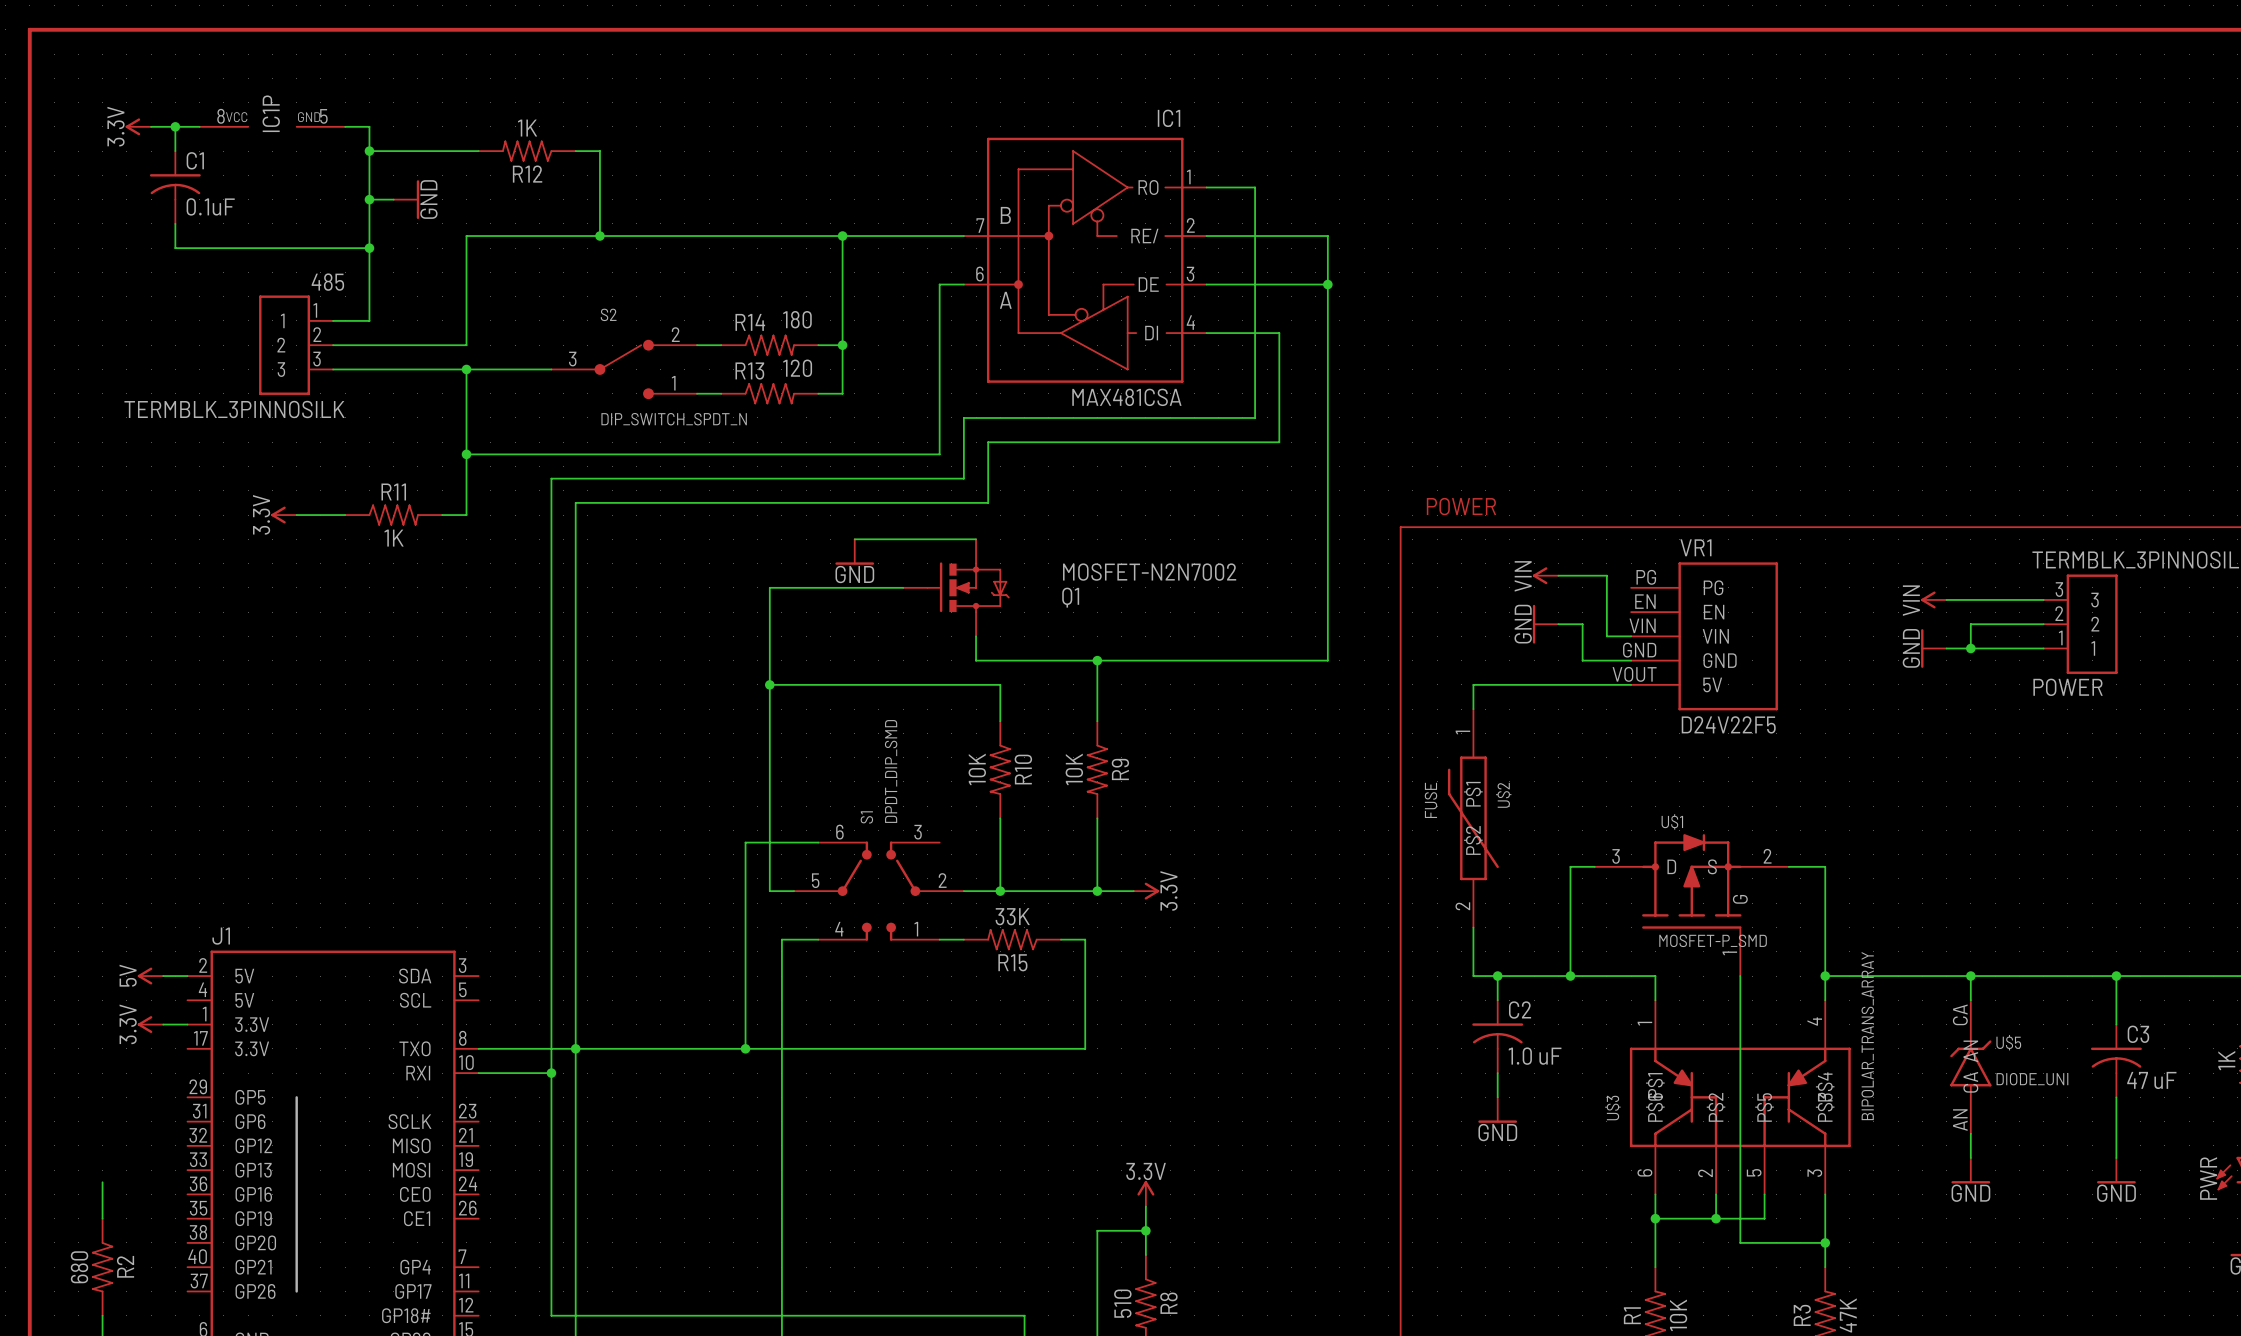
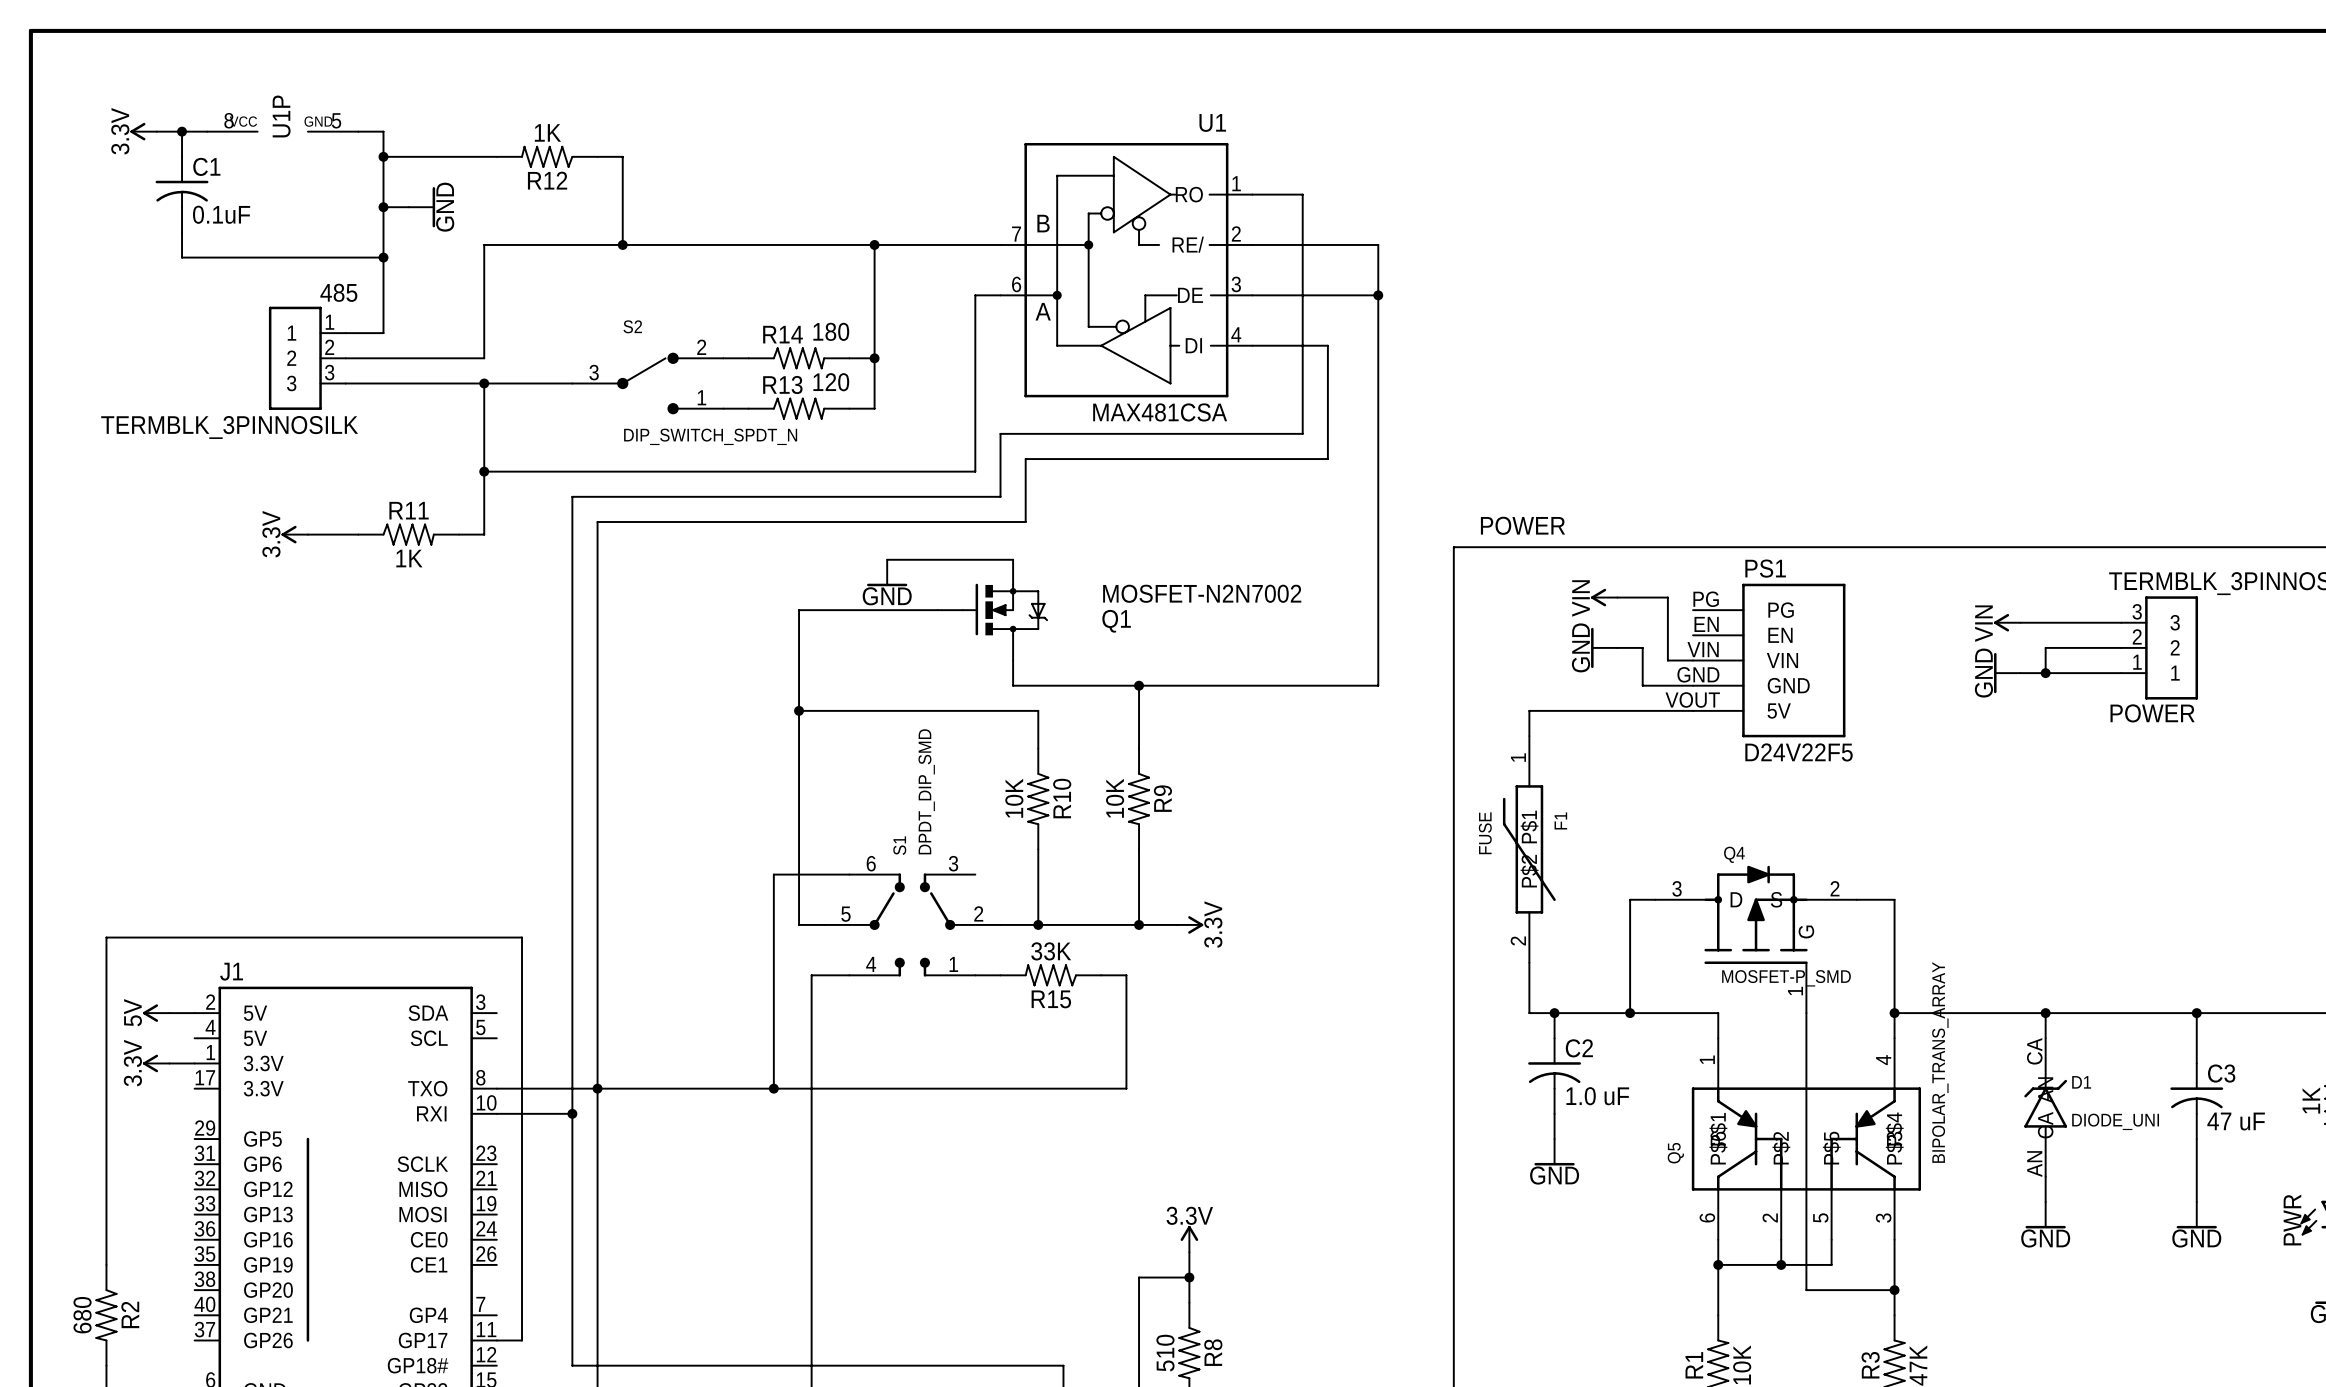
IC1P name: IC1P (271, 113) -> U1P (281, 116)
IC1 name: IC1 (1169, 118) -> U1 (1212, 122)
VR1 name: VR1 (1695, 547) -> PS1 (1765, 568)
U$2 name: U$2 (1503, 795) -> F1 (1560, 820)
U$1 name: U$1 (1672, 821) -> Q4 (1734, 854)
U$5 name: U$5 (2008, 1042) -> D1 (2081, 1082)
U$3 name: U$3 (1612, 1108) -> Q5 (1675, 1153)
wire: none -> (106, 1227) (106, 937) (522, 937) (522, 1340) (496, 1340)

